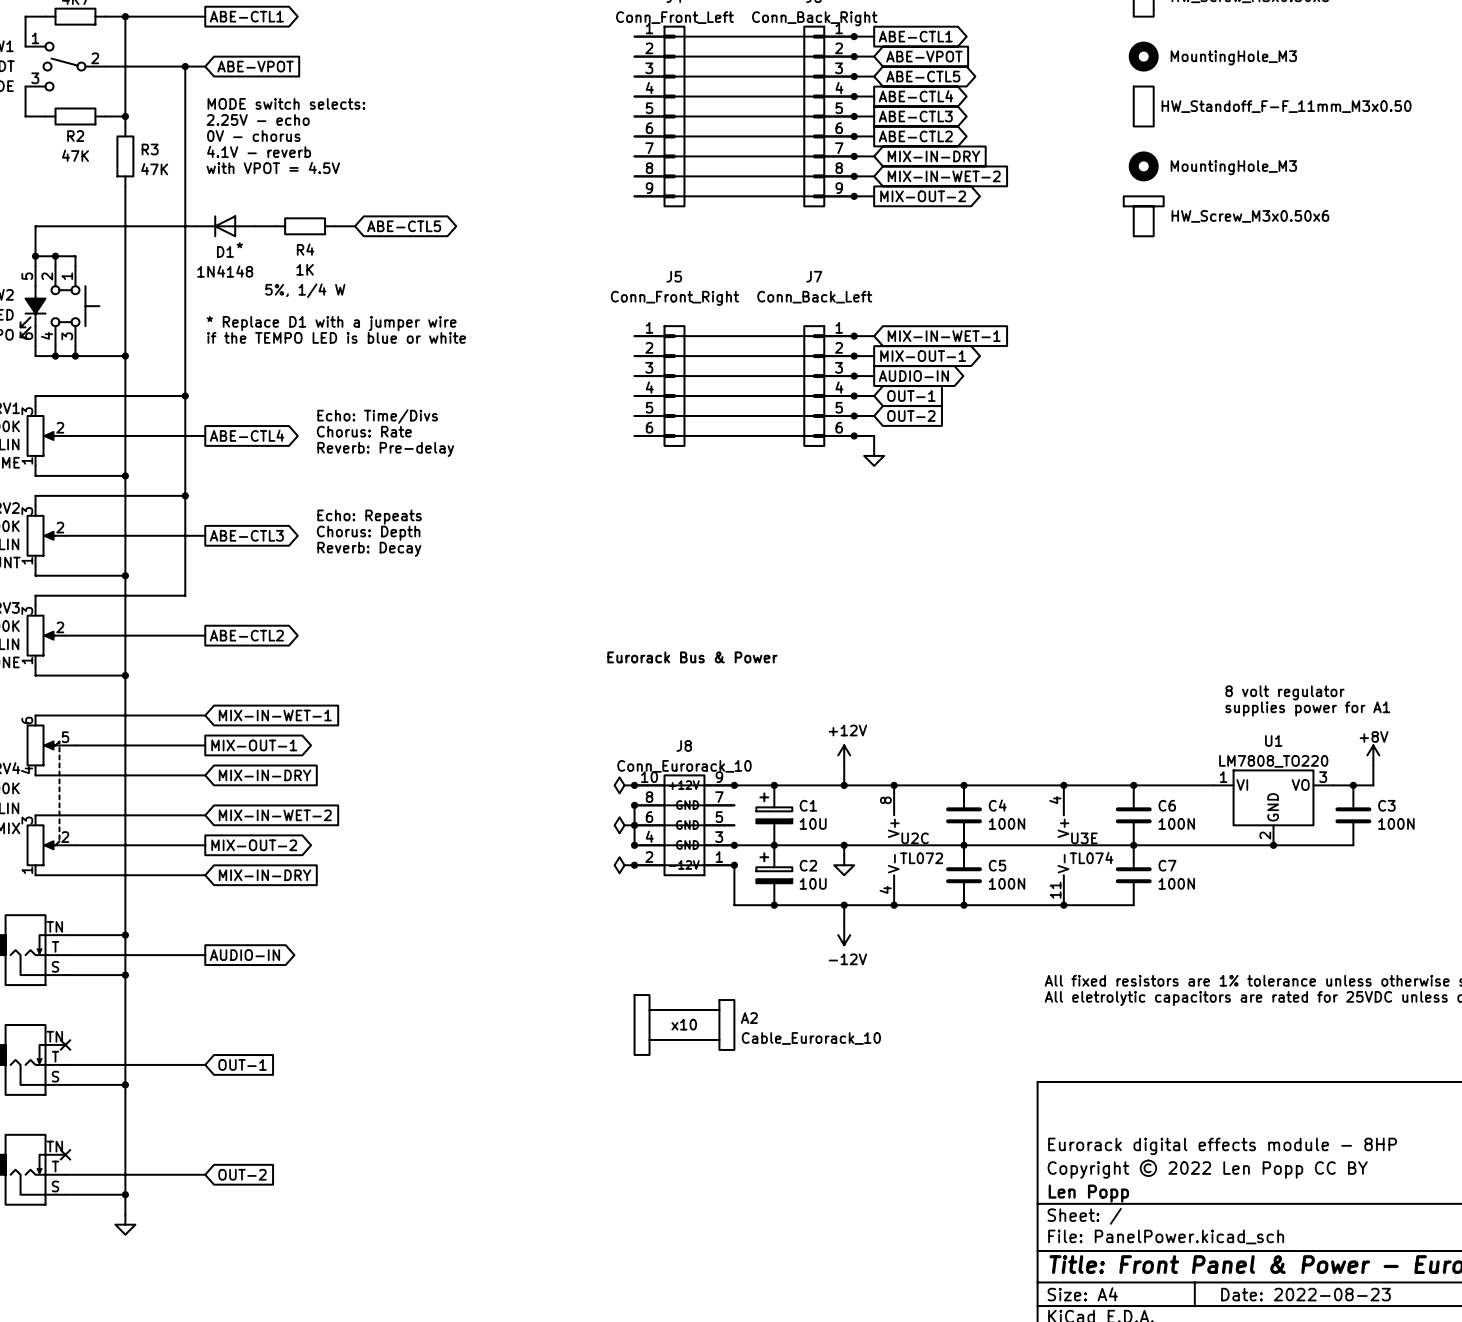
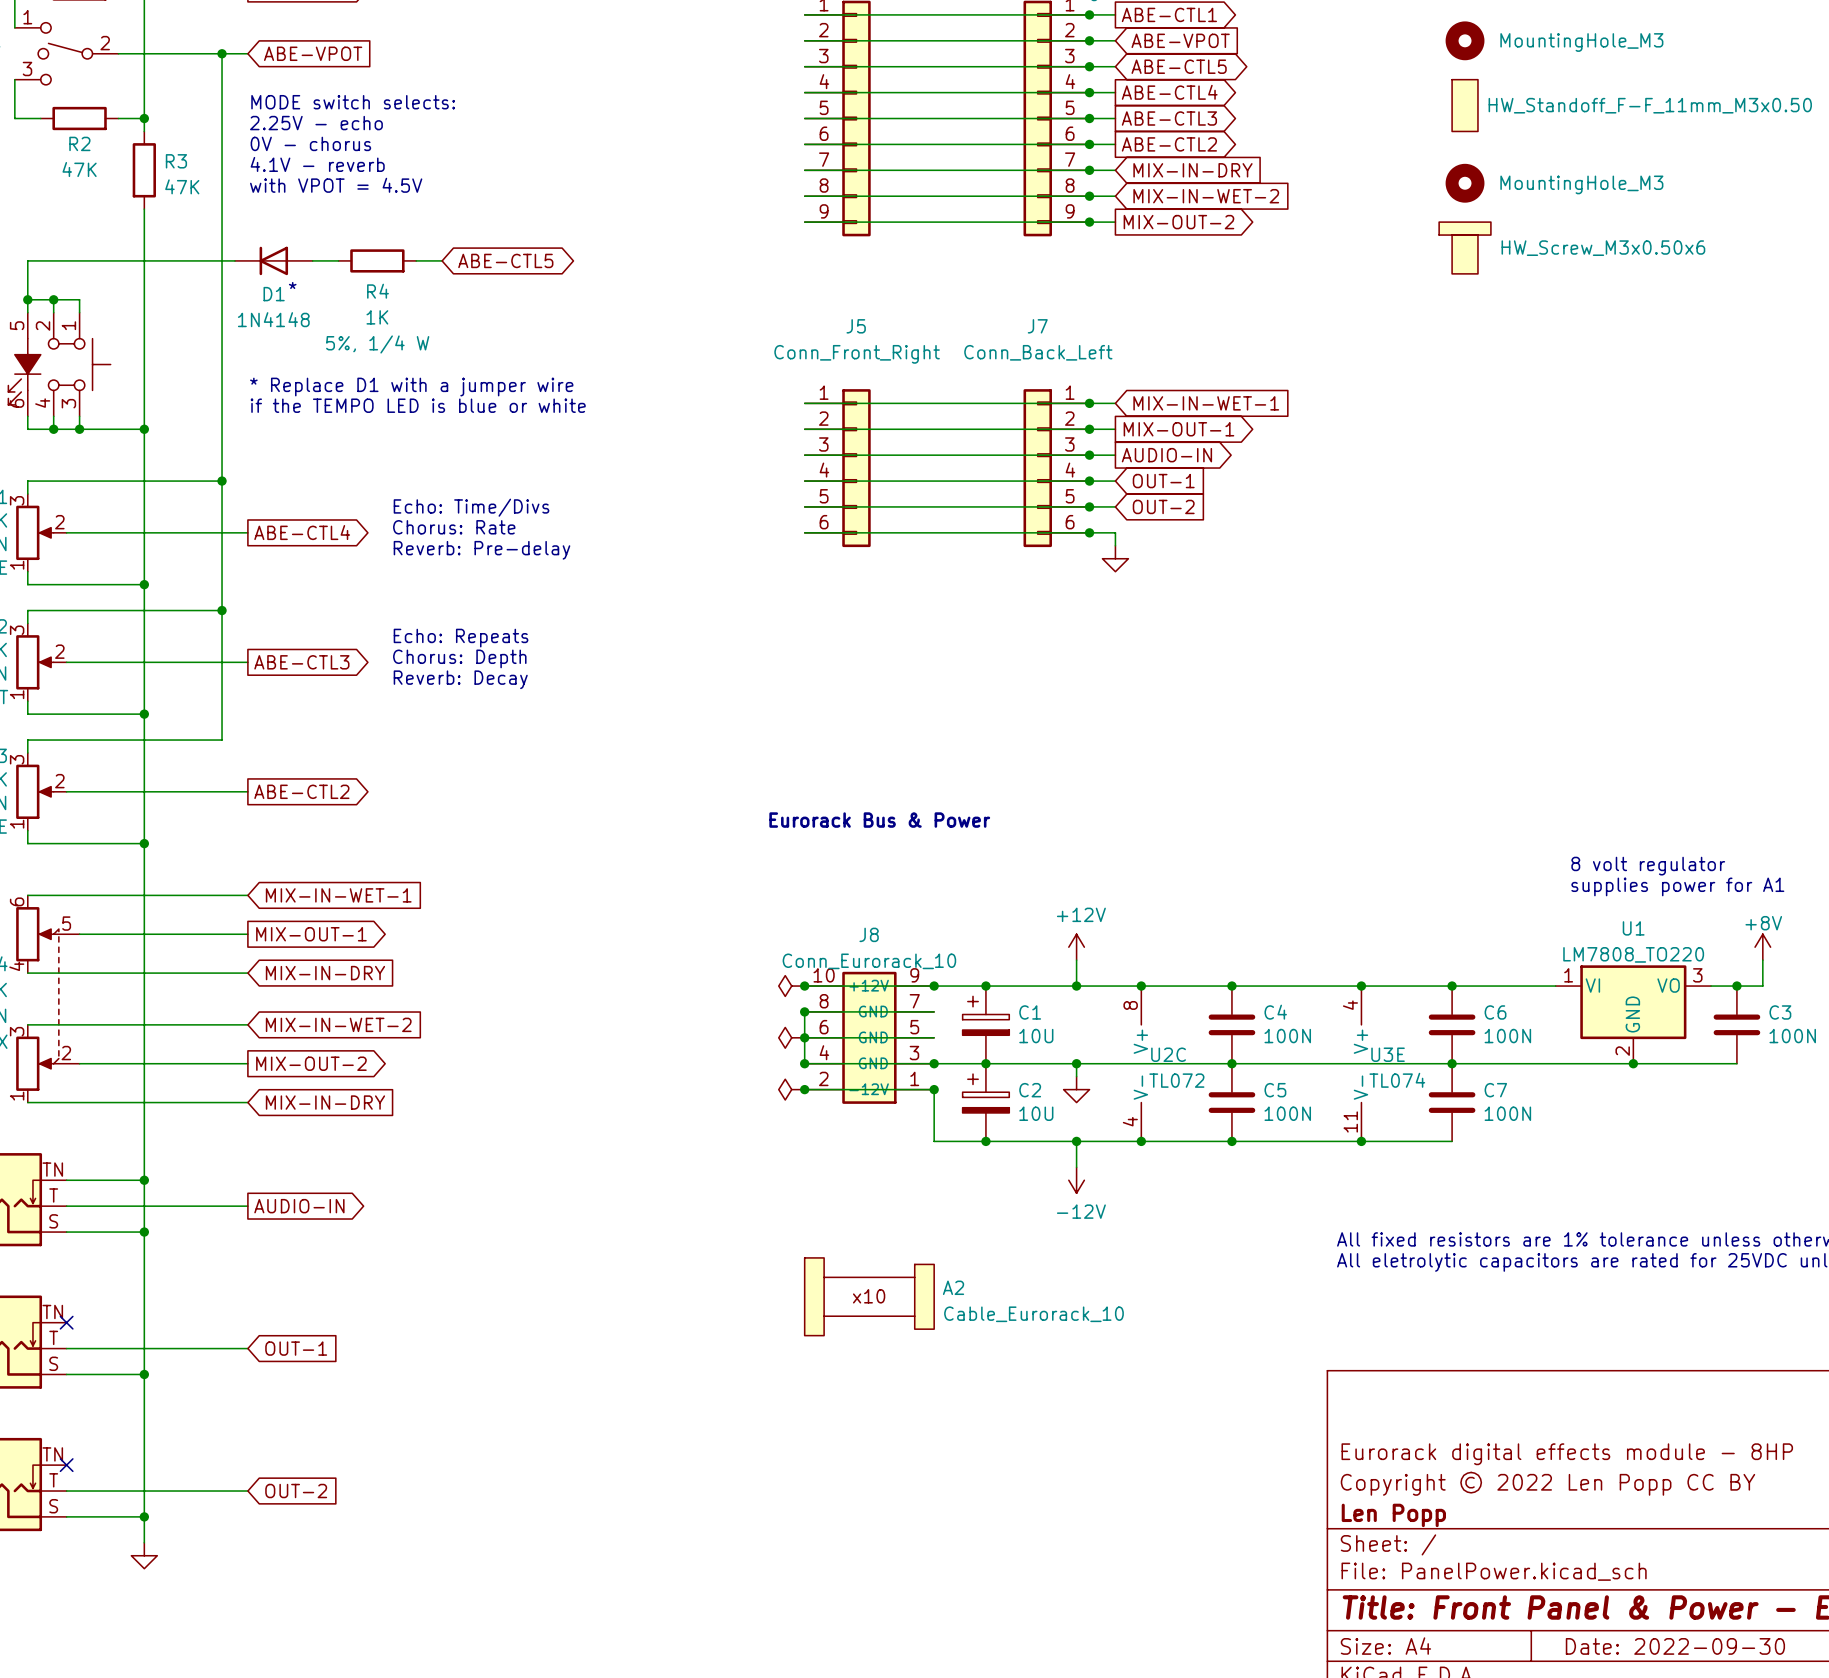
title block: Date: 2022-08-23 (1305, 1294) -> Date: 2022-09-30 (1675, 1646)

